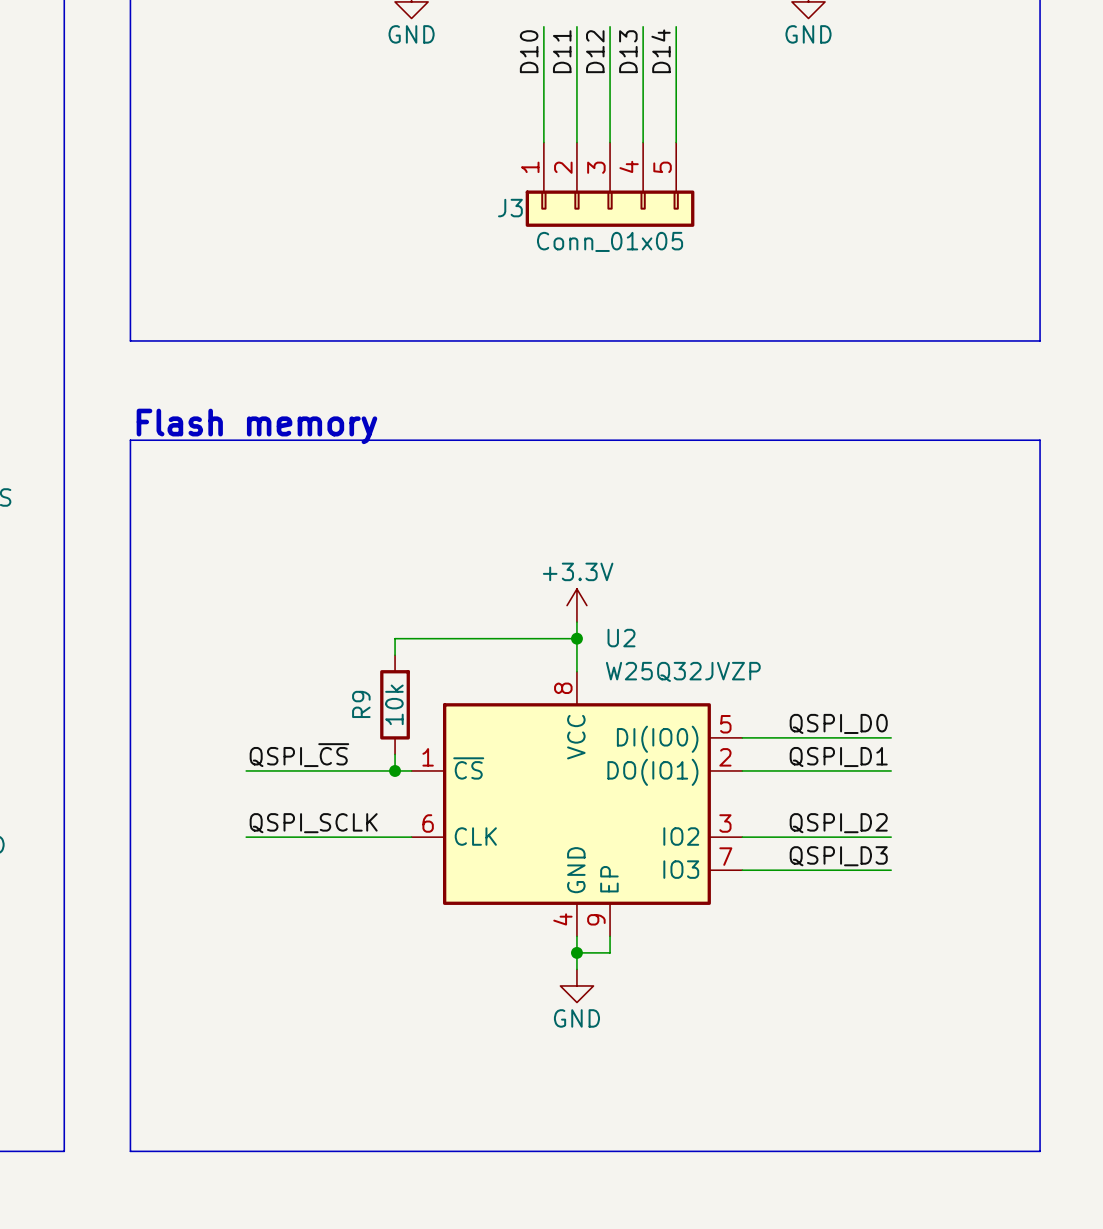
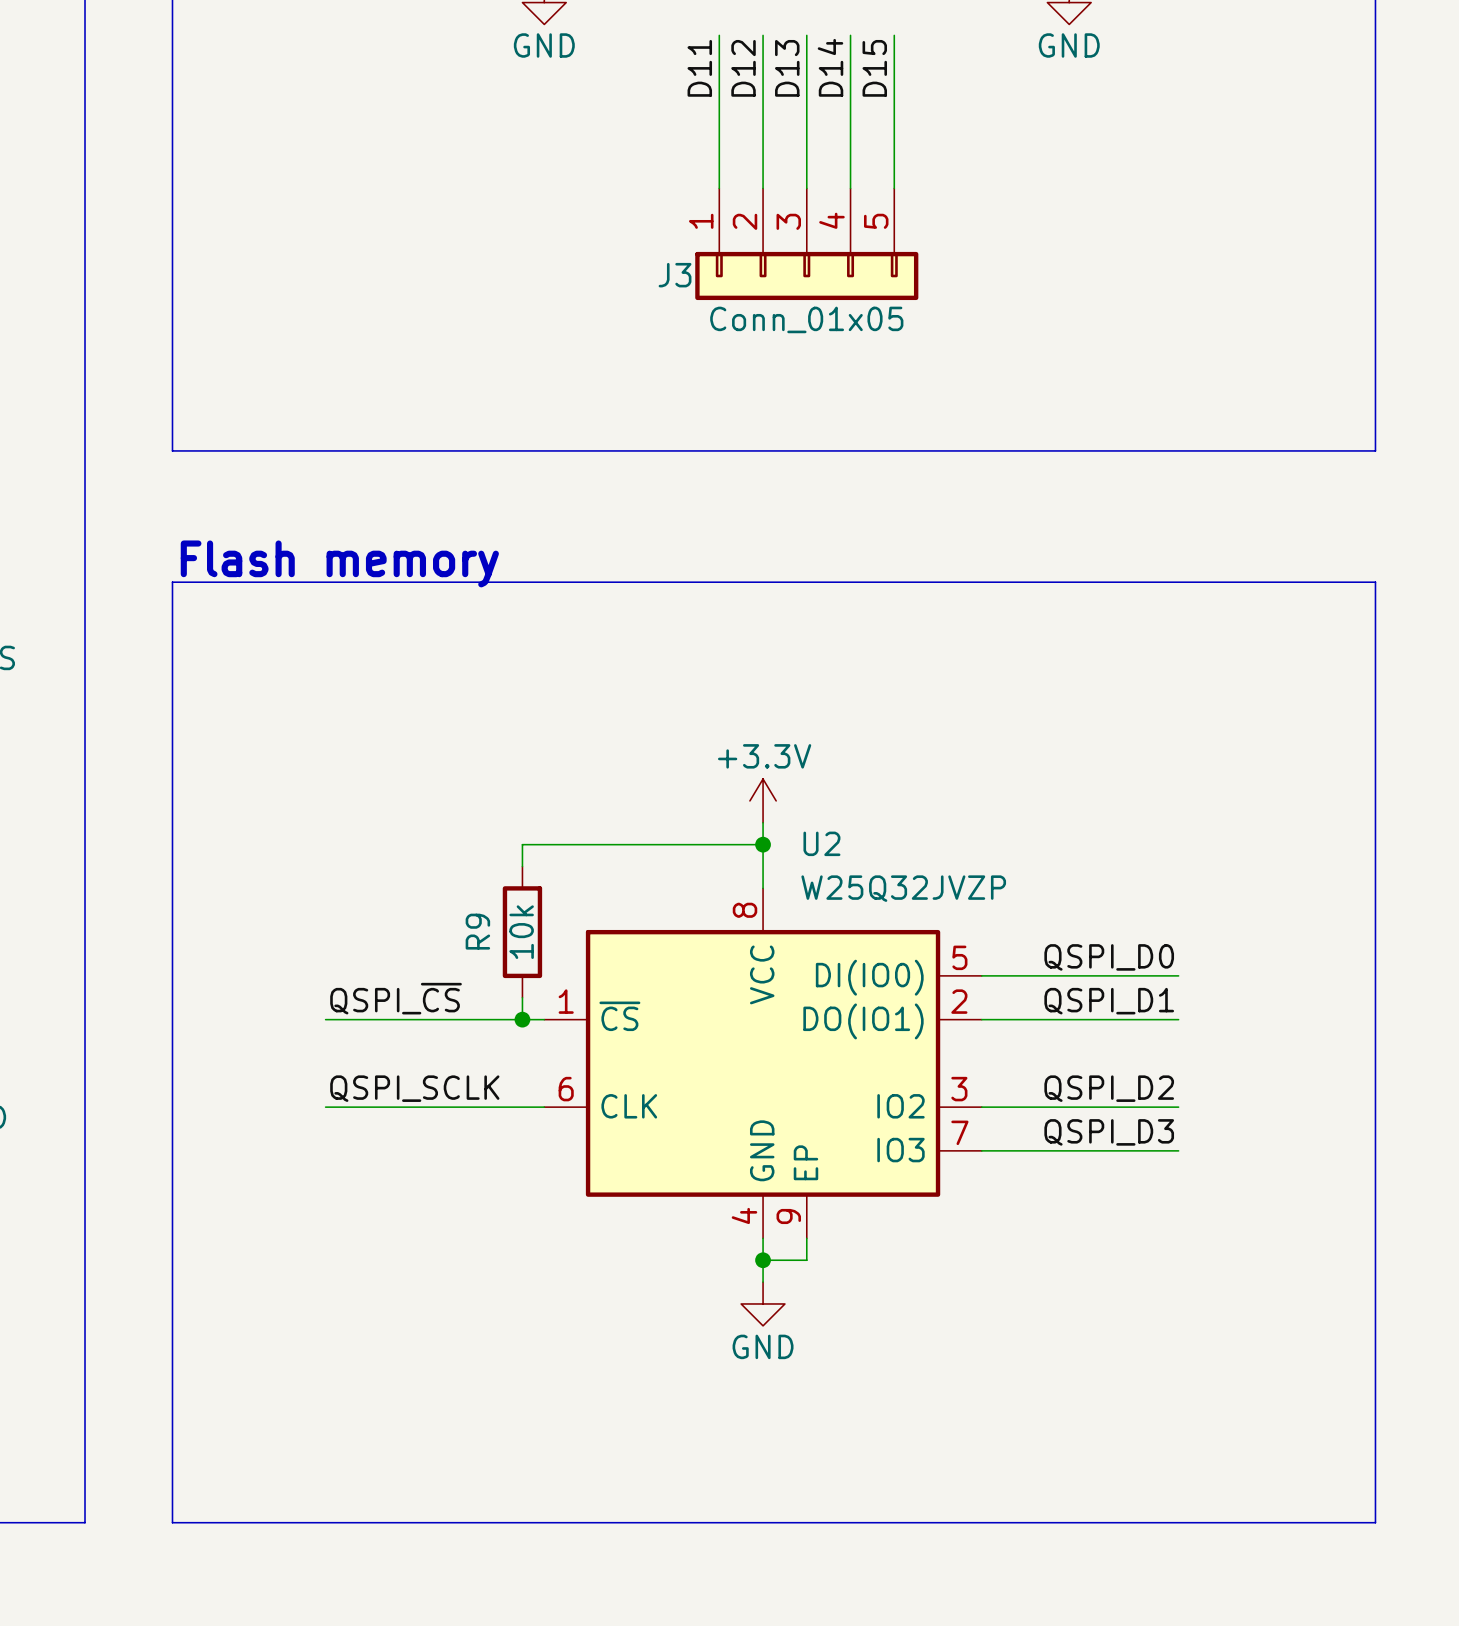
label: D10 (529, 51) -> D11 (699, 68)
label: D11 (562, 51) -> D12 (743, 68)
label: D12 (595, 51) -> D13 (787, 68)
label: D13 (628, 51) -> D14 (830, 67)
label: D14 (661, 51) -> D15 (874, 68)

